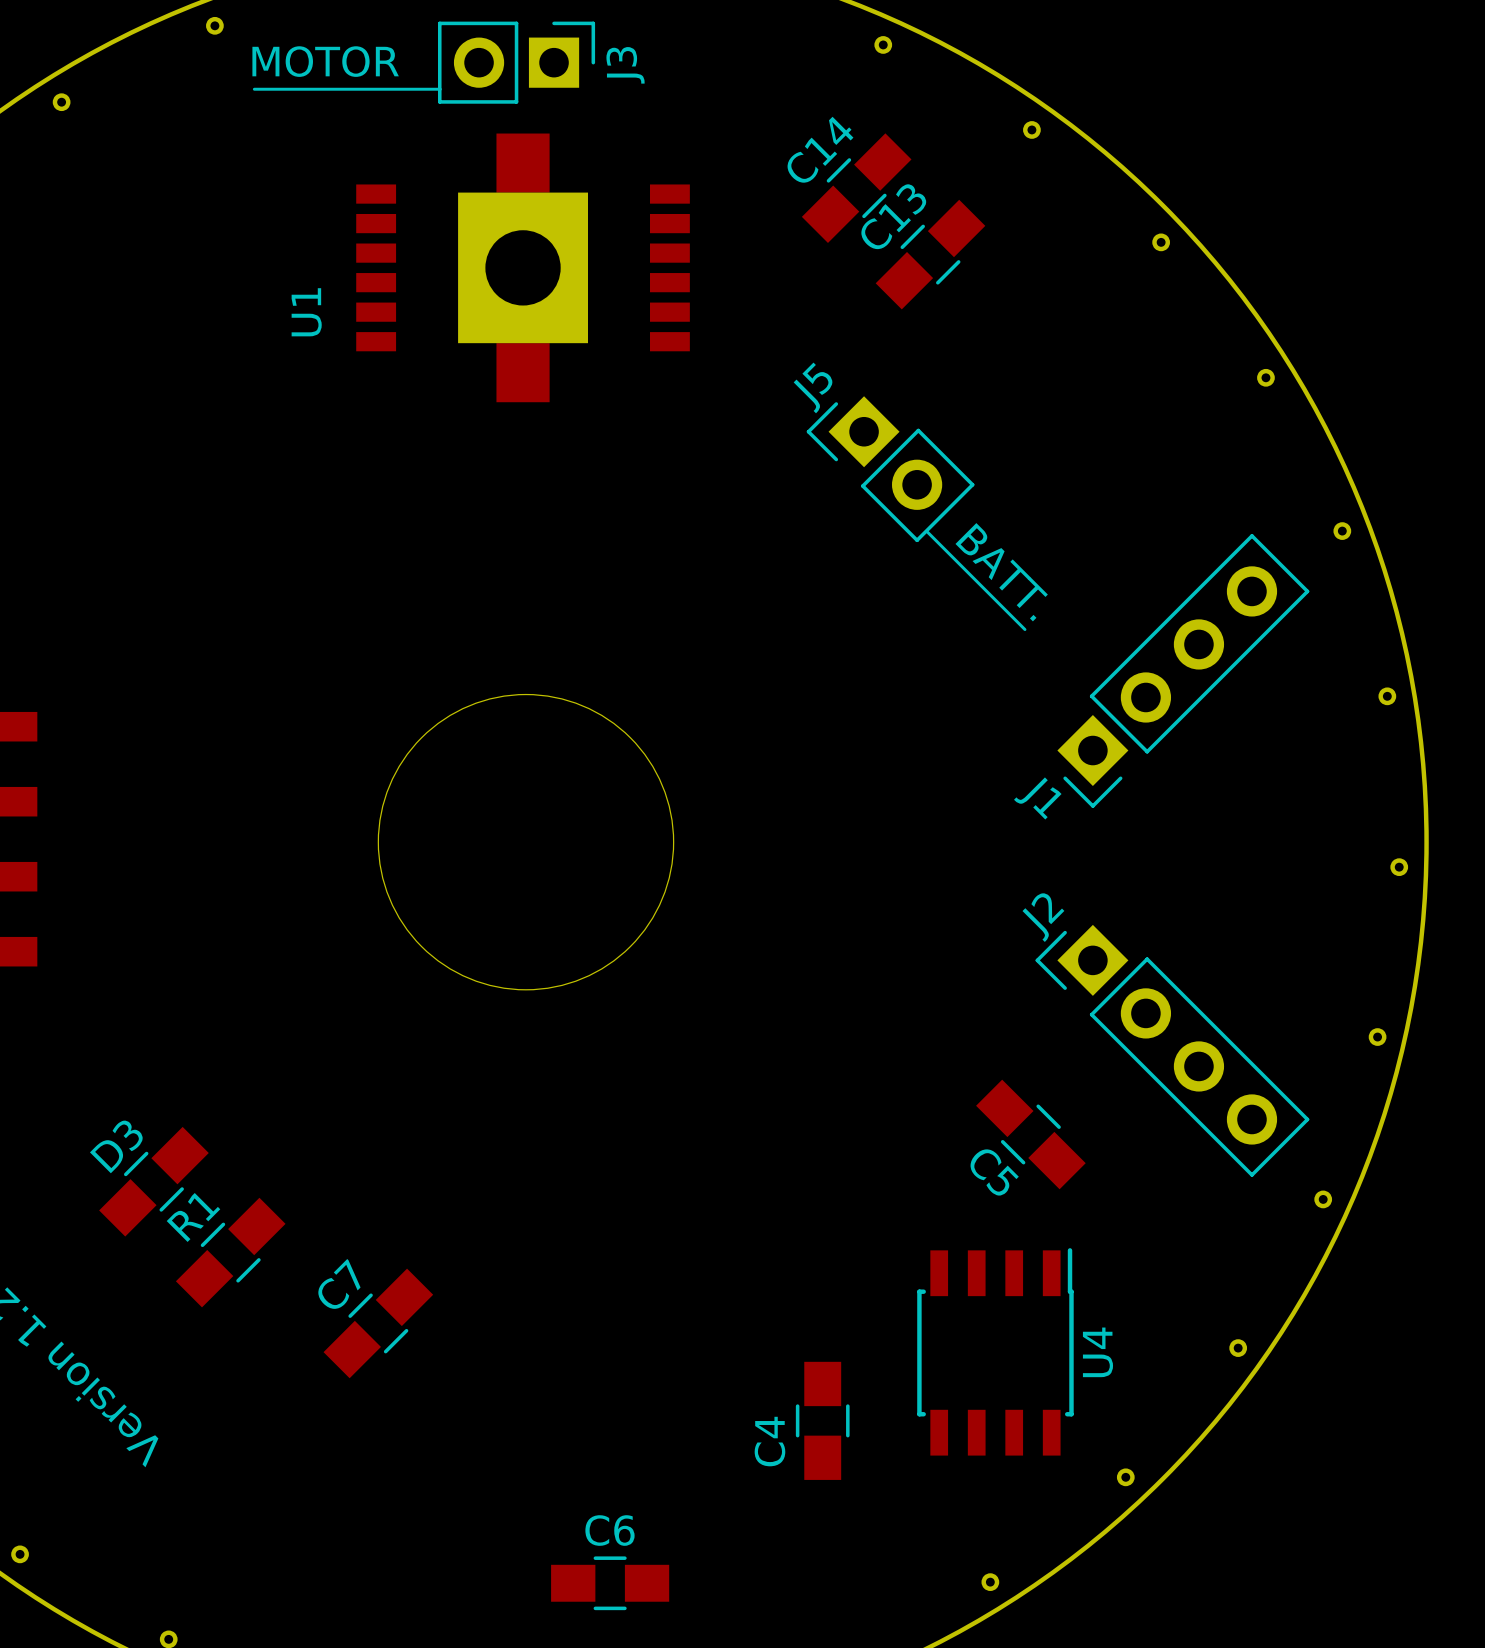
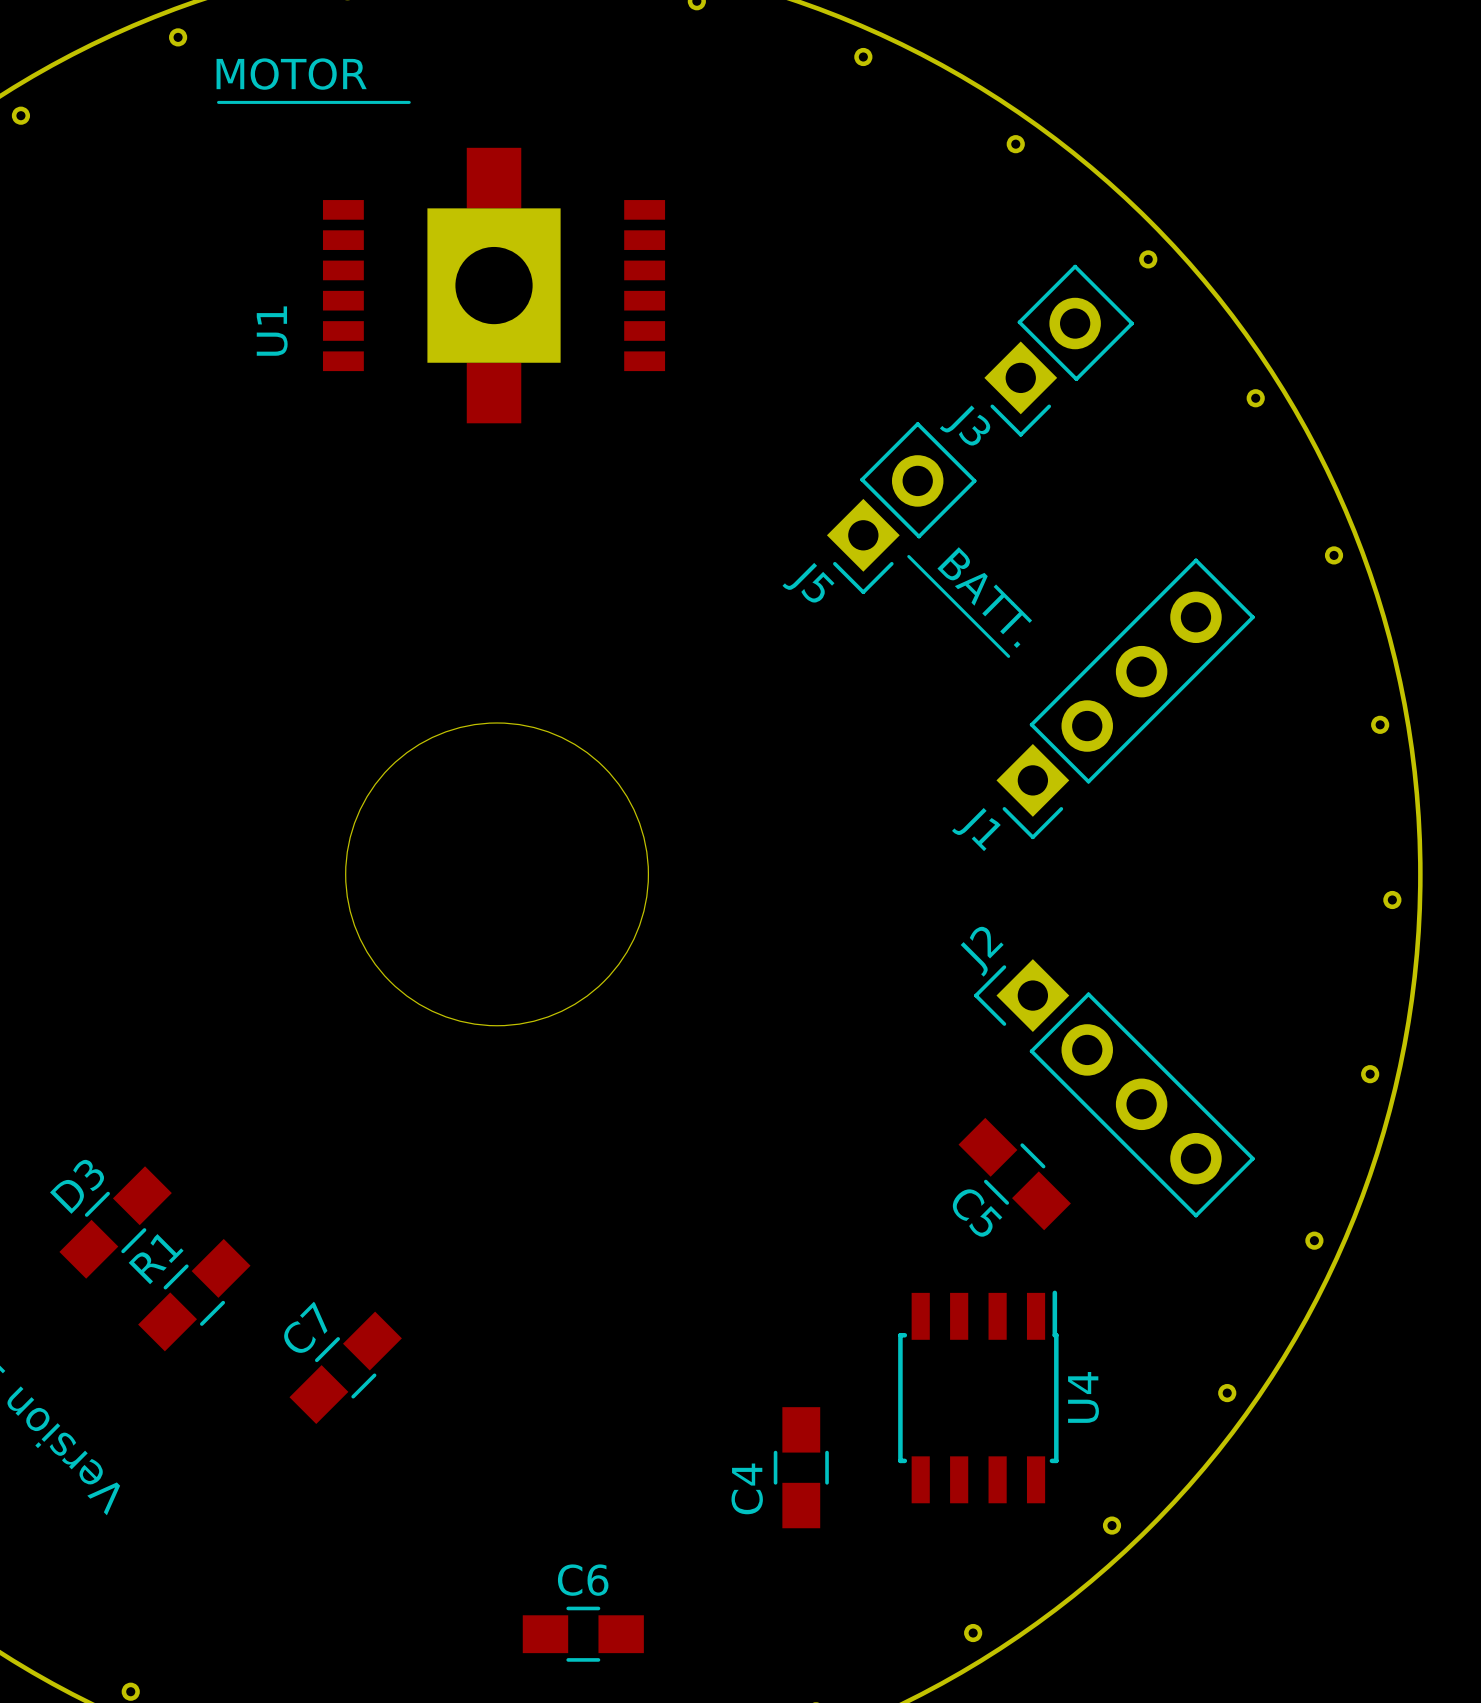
J3 rotation: 0° (516, 62) -> 135° clockwise (1059, 350)
J3 position: (516, 62) -> (1059, 350)
C14: (856, 188) -> none
C13: (930, 254) -> none
J5 rotation: 0° (890, 469) -> 90° counterclockwise (901, 508)
J1 position: (1183, 670) -> (1125, 698)
J2 position: (1172, 1050) -> (1114, 1088)

